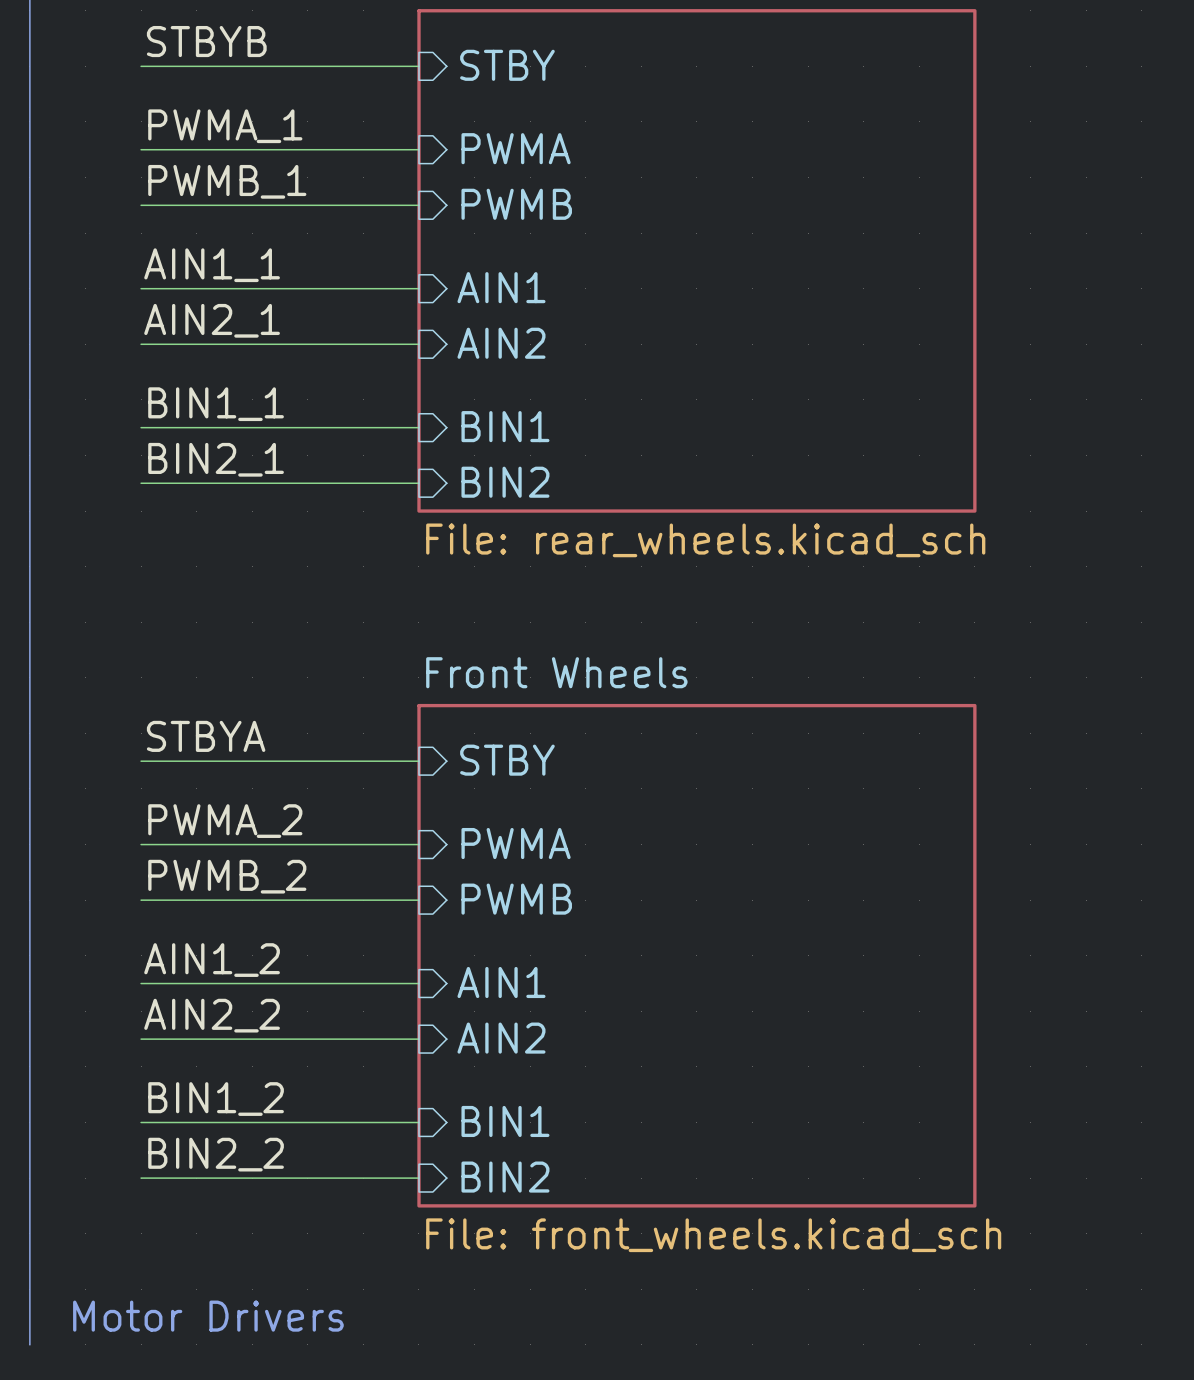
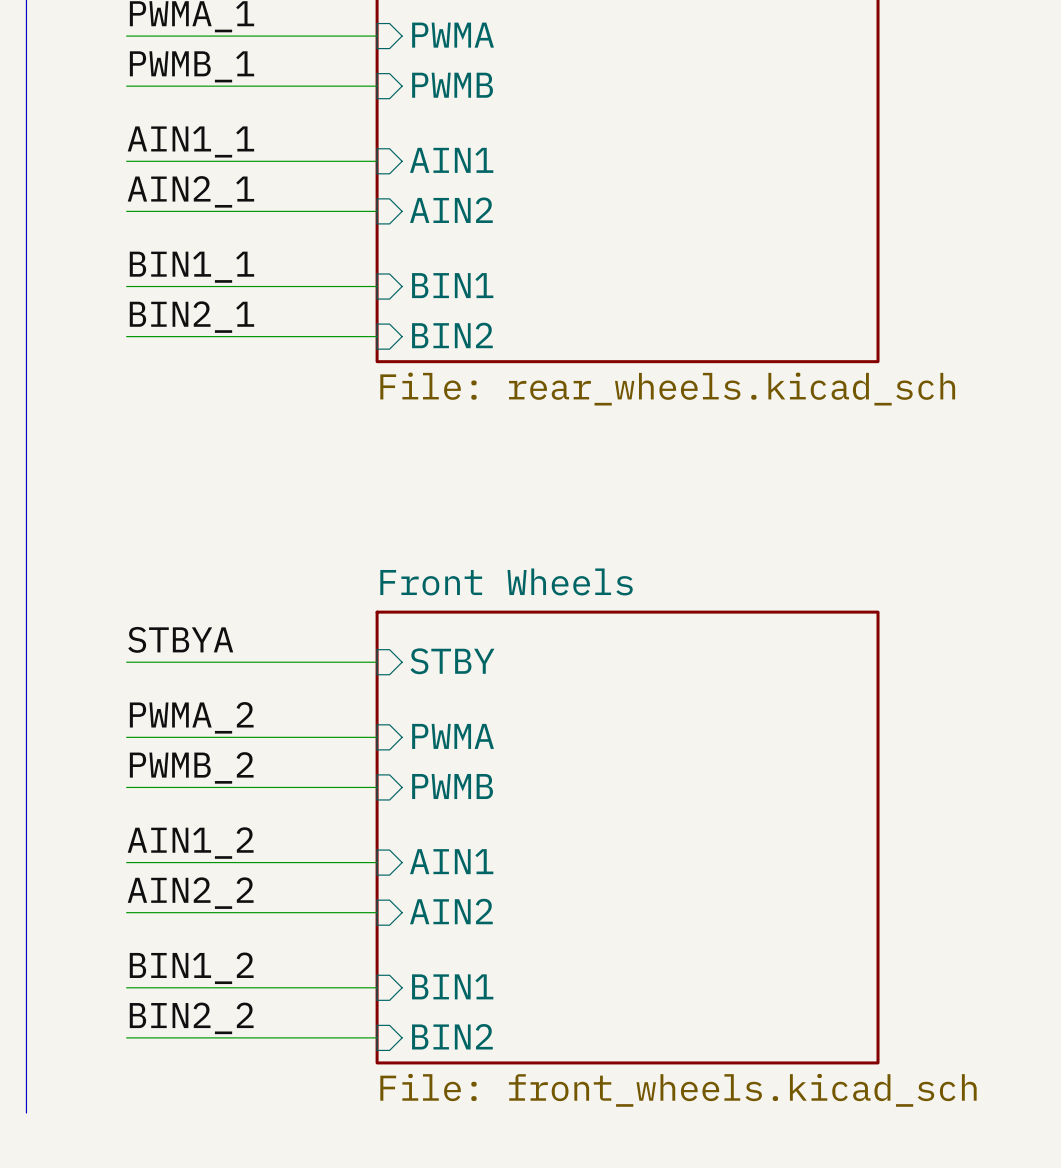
label: STBYA (206, 736) -> none
sheet pin: STBY (507, 760) -> none
wire: (141, 761) (418, 761) -> (126, 1037) (377, 1037)
label: PWMA_2 (225, 821) -> STBYA (180, 639)
sheet pin: PWMA (516, 843) -> STBY (452, 661)
label: PWMB_2 (227, 876) -> PWMA_2 (191, 717)
sheet pin: PWMB (516, 899) -> PWMA (453, 736)
wire: (141, 900) (418, 900) -> (126, 737) (377, 737)
sheet Front Wheels position: (696, 955) -> (627, 837)
label: AIN1_2 (212, 960) -> PWMB_2 (191, 767)
sheet pin: AIN1 (501, 982) -> PWMB (452, 786)
label: AIN2_2 (212, 1015) -> AIN1_2 (190, 843)
sheet pin: AIN2 (501, 1038) -> AIN1 (451, 861)
wire: (141, 1039) (418, 1039) -> (126, 862) (377, 862)
label: BIN1_2 (216, 1099) -> AIN2_2 (190, 893)
sheet pin: BIN1 (505, 1121) -> AIN2 (451, 911)
label position: BIN2_2 (216, 1154) -> BIN2_2 (191, 1018)
sheet pin position: BIN2 (505, 1177) -> BIN2 (452, 1036)
wire: (141, 1178) (418, 1178) -> (126, 987) (377, 987)
label: none -> BIN1_2 (191, 968)
sheet pin: none -> BIN1 (452, 986)
text: Motor Drivers (208, 1316) -> none

